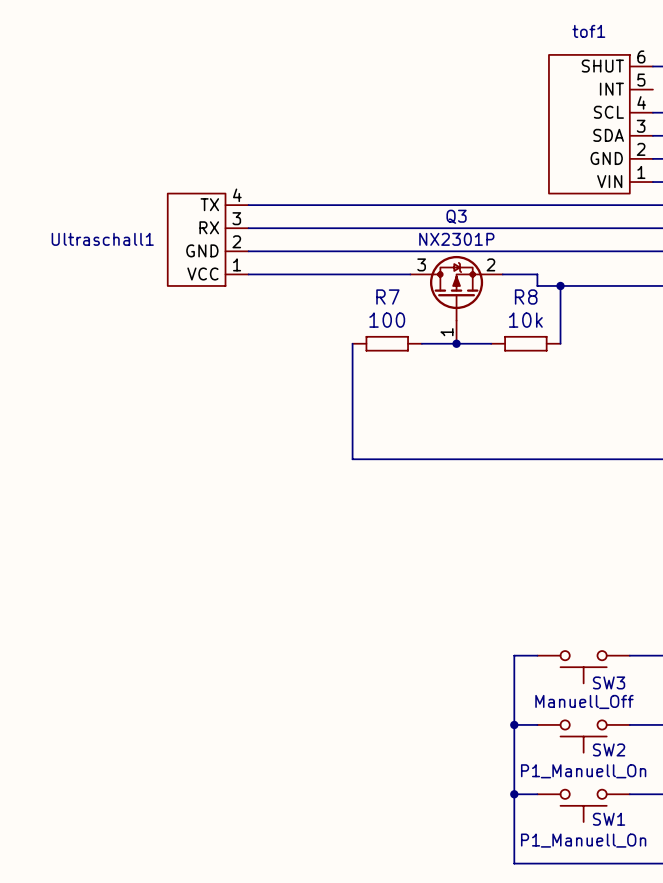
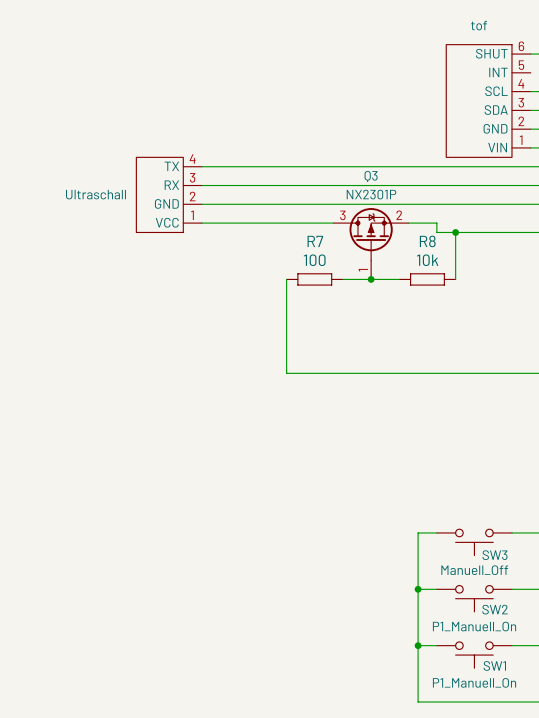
tof1 name: tof1 (588, 31) -> tof (479, 25)
Ultraschall1 name: Ultraschall1 (102, 239) -> Ultraschall (95, 194)

